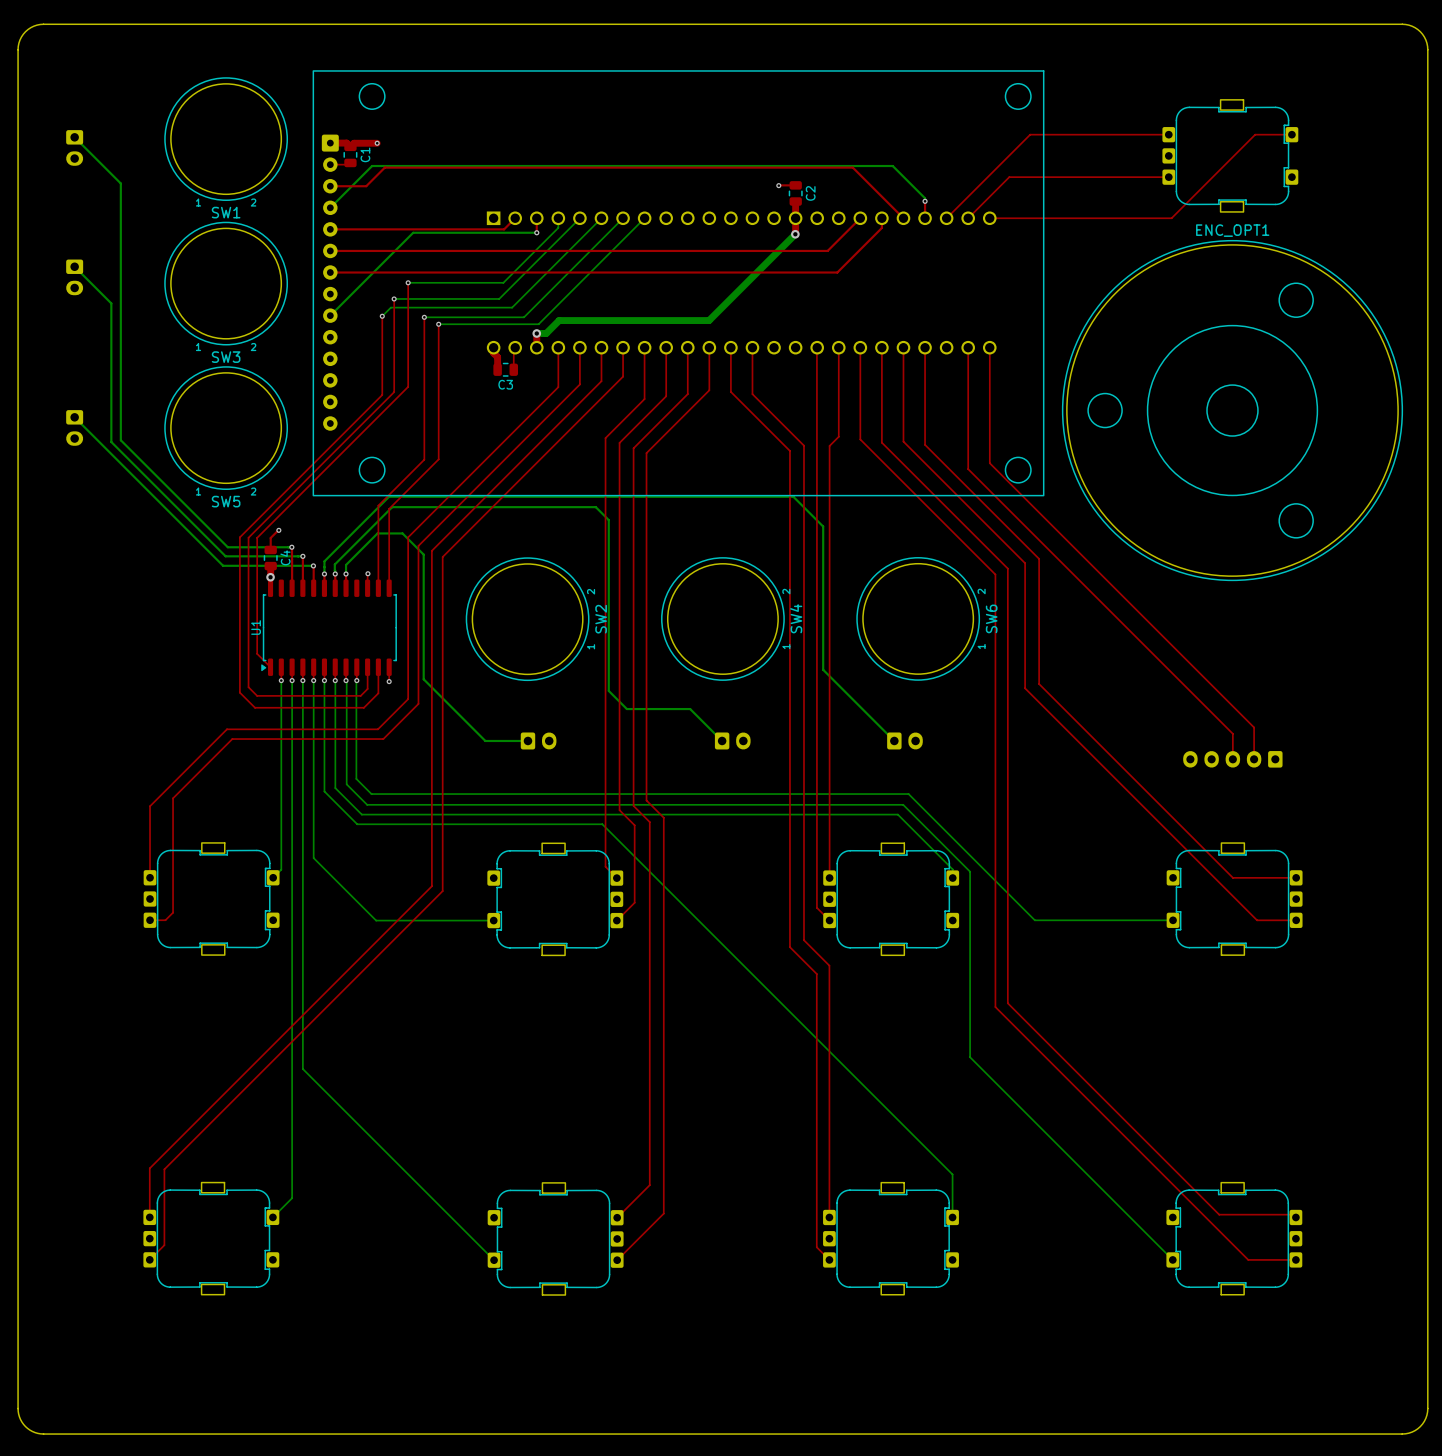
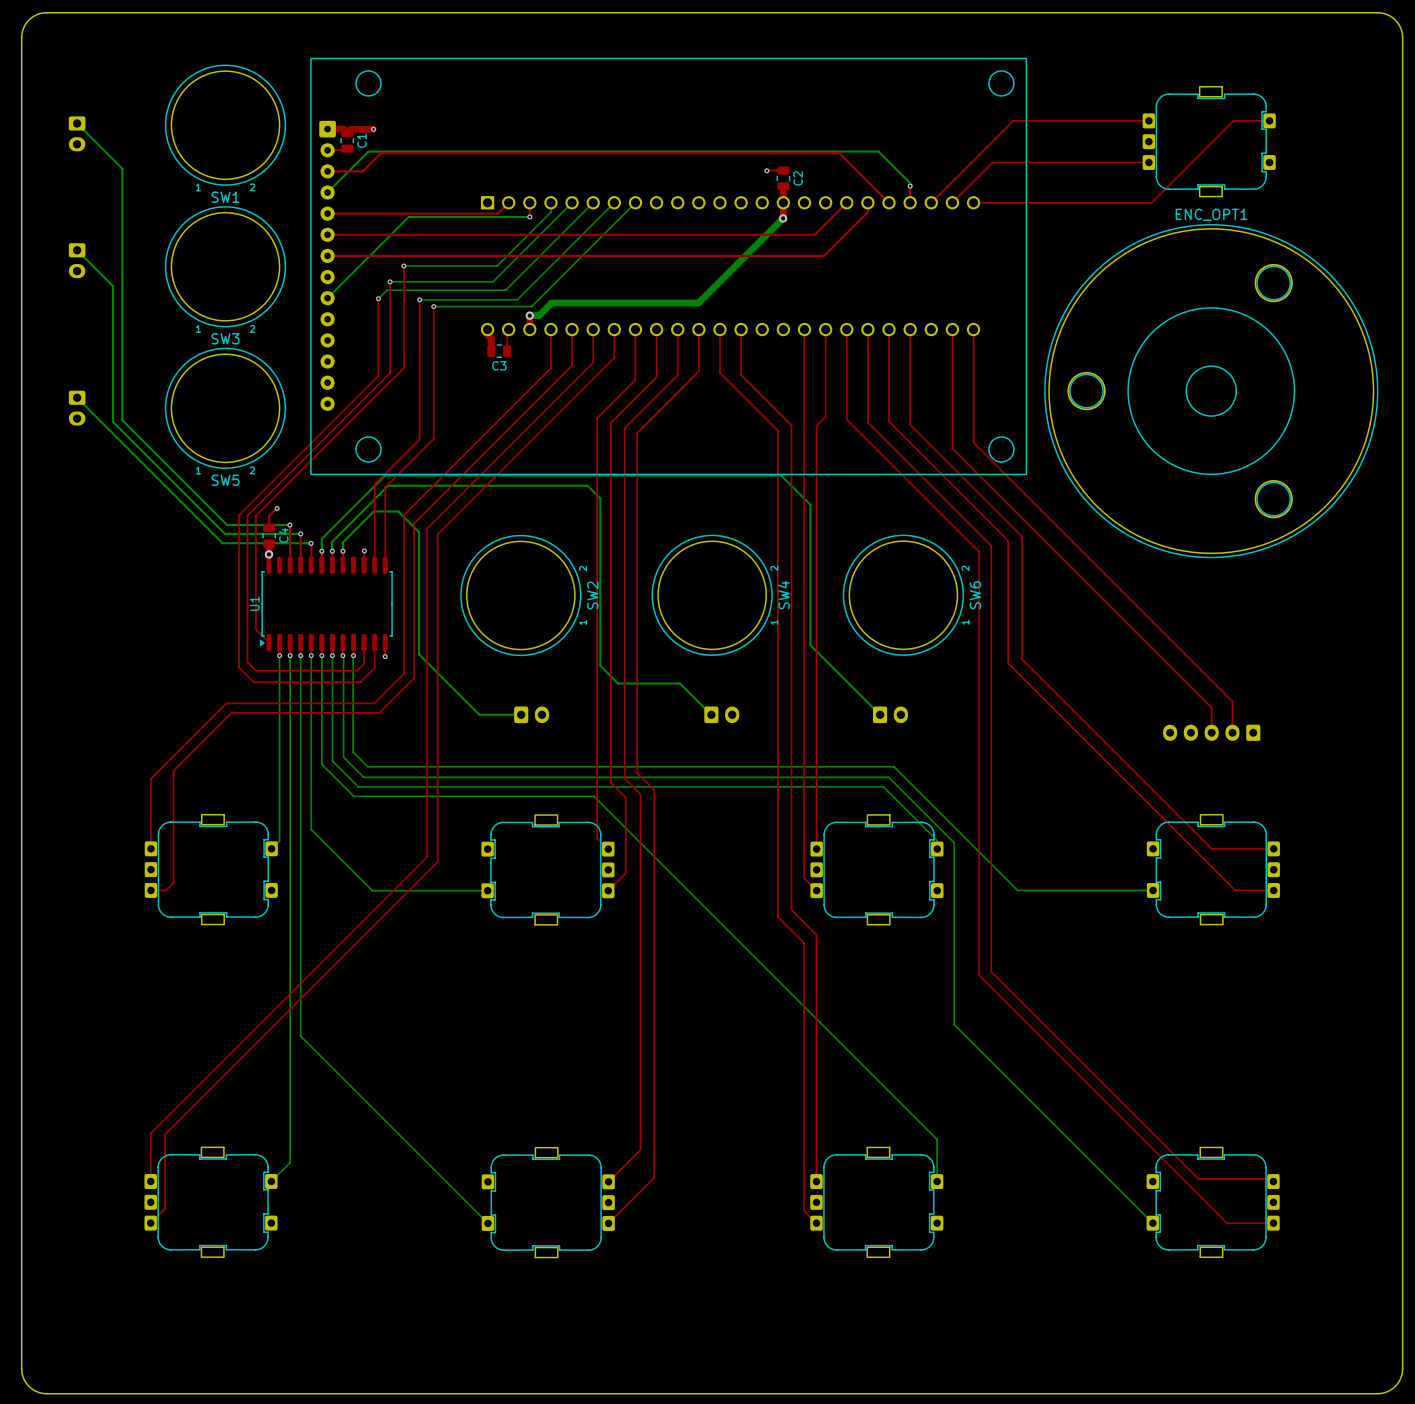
ENC_OPT1 footprint: [1062, 240, 1403, 581] -> [1044, 224, 1379, 558]

